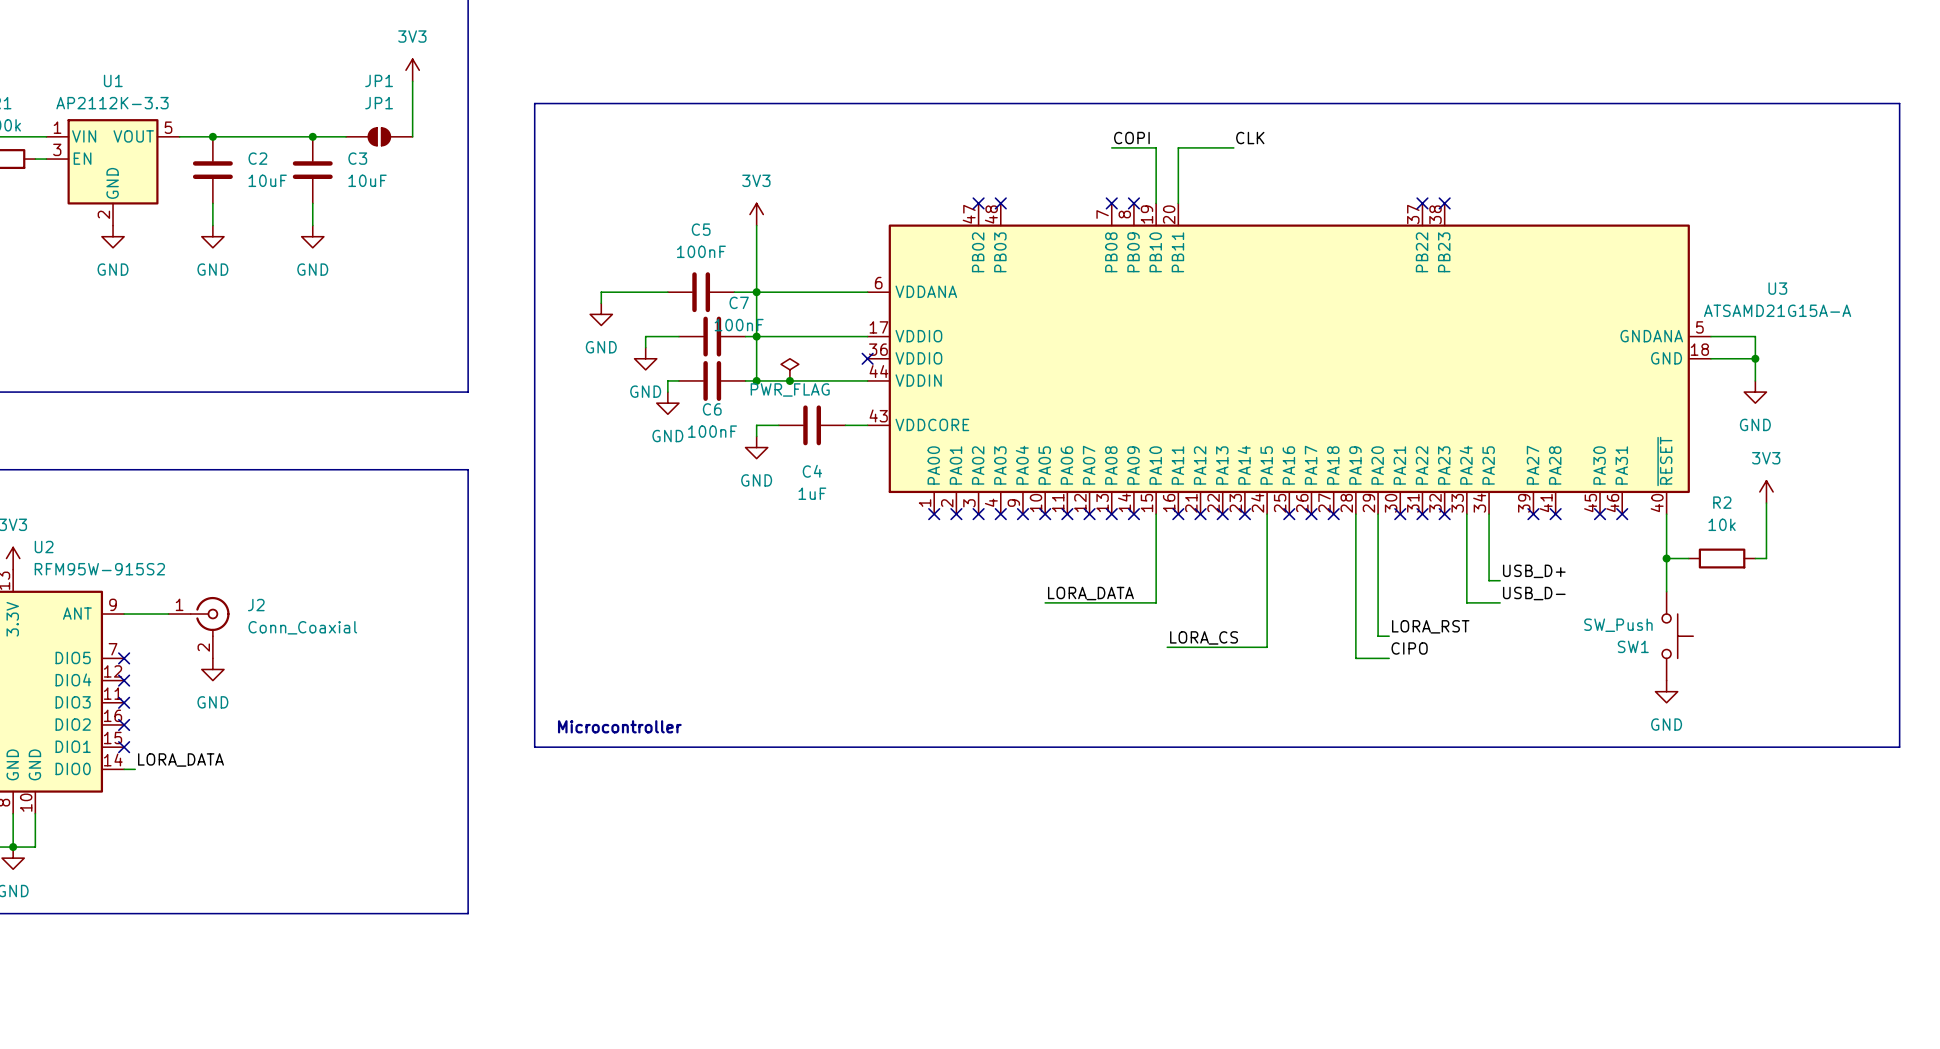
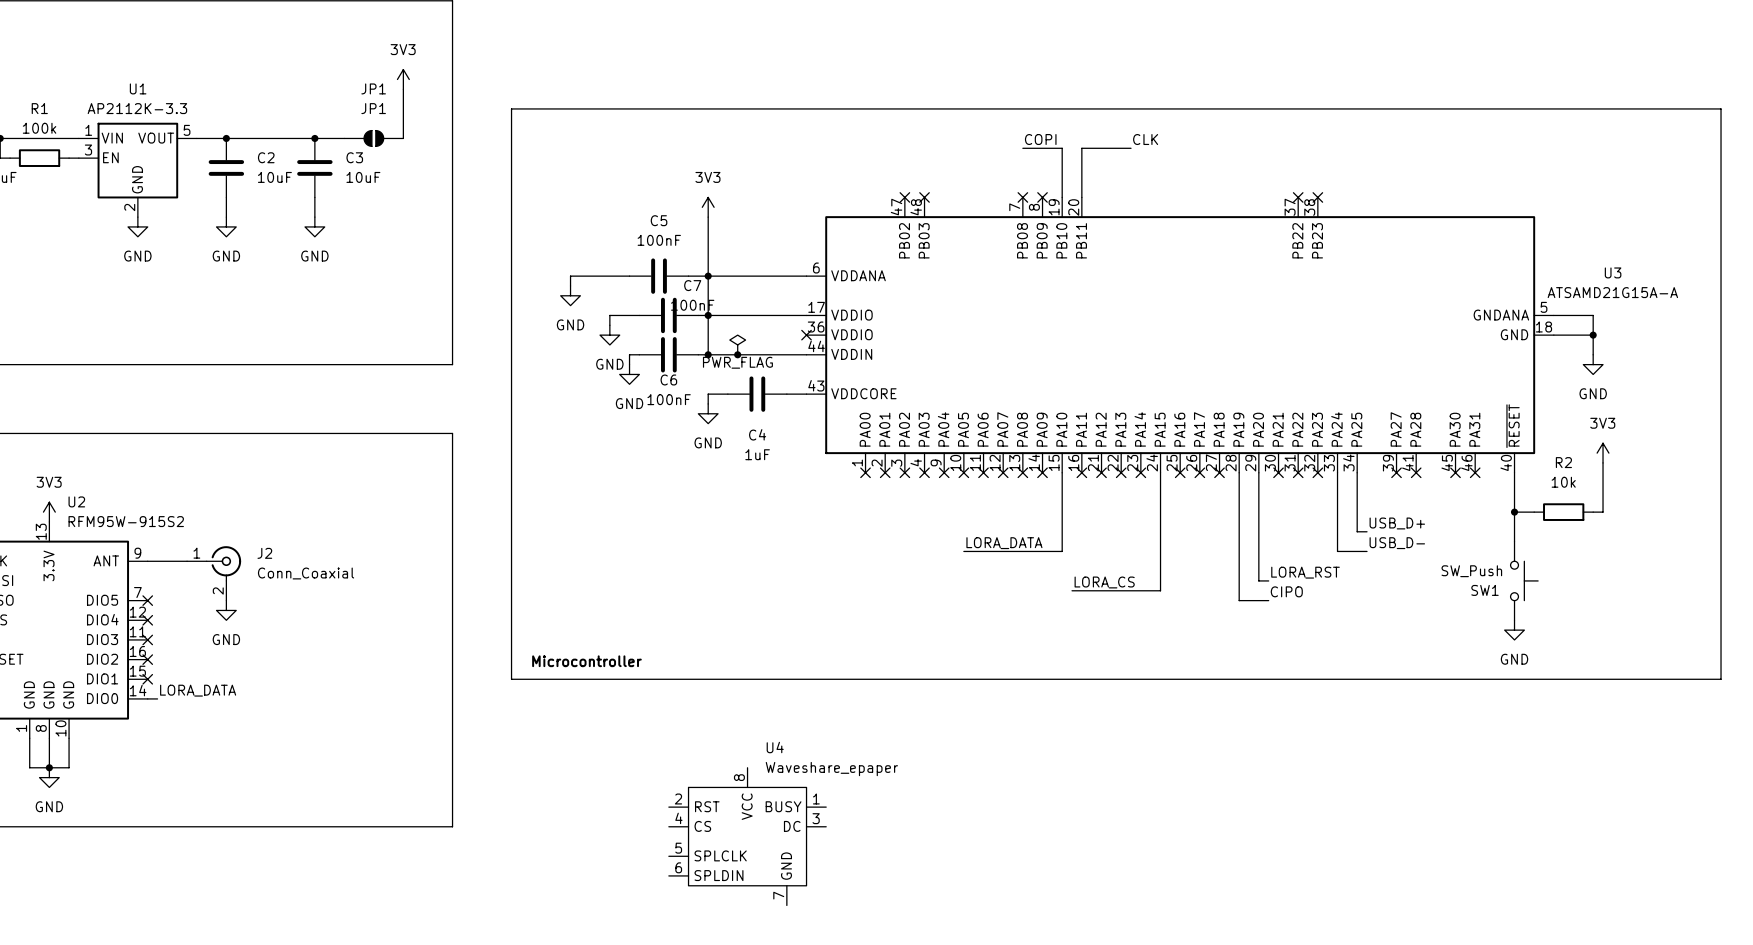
U4: none -> Waveshare_epaper (747, 836)

